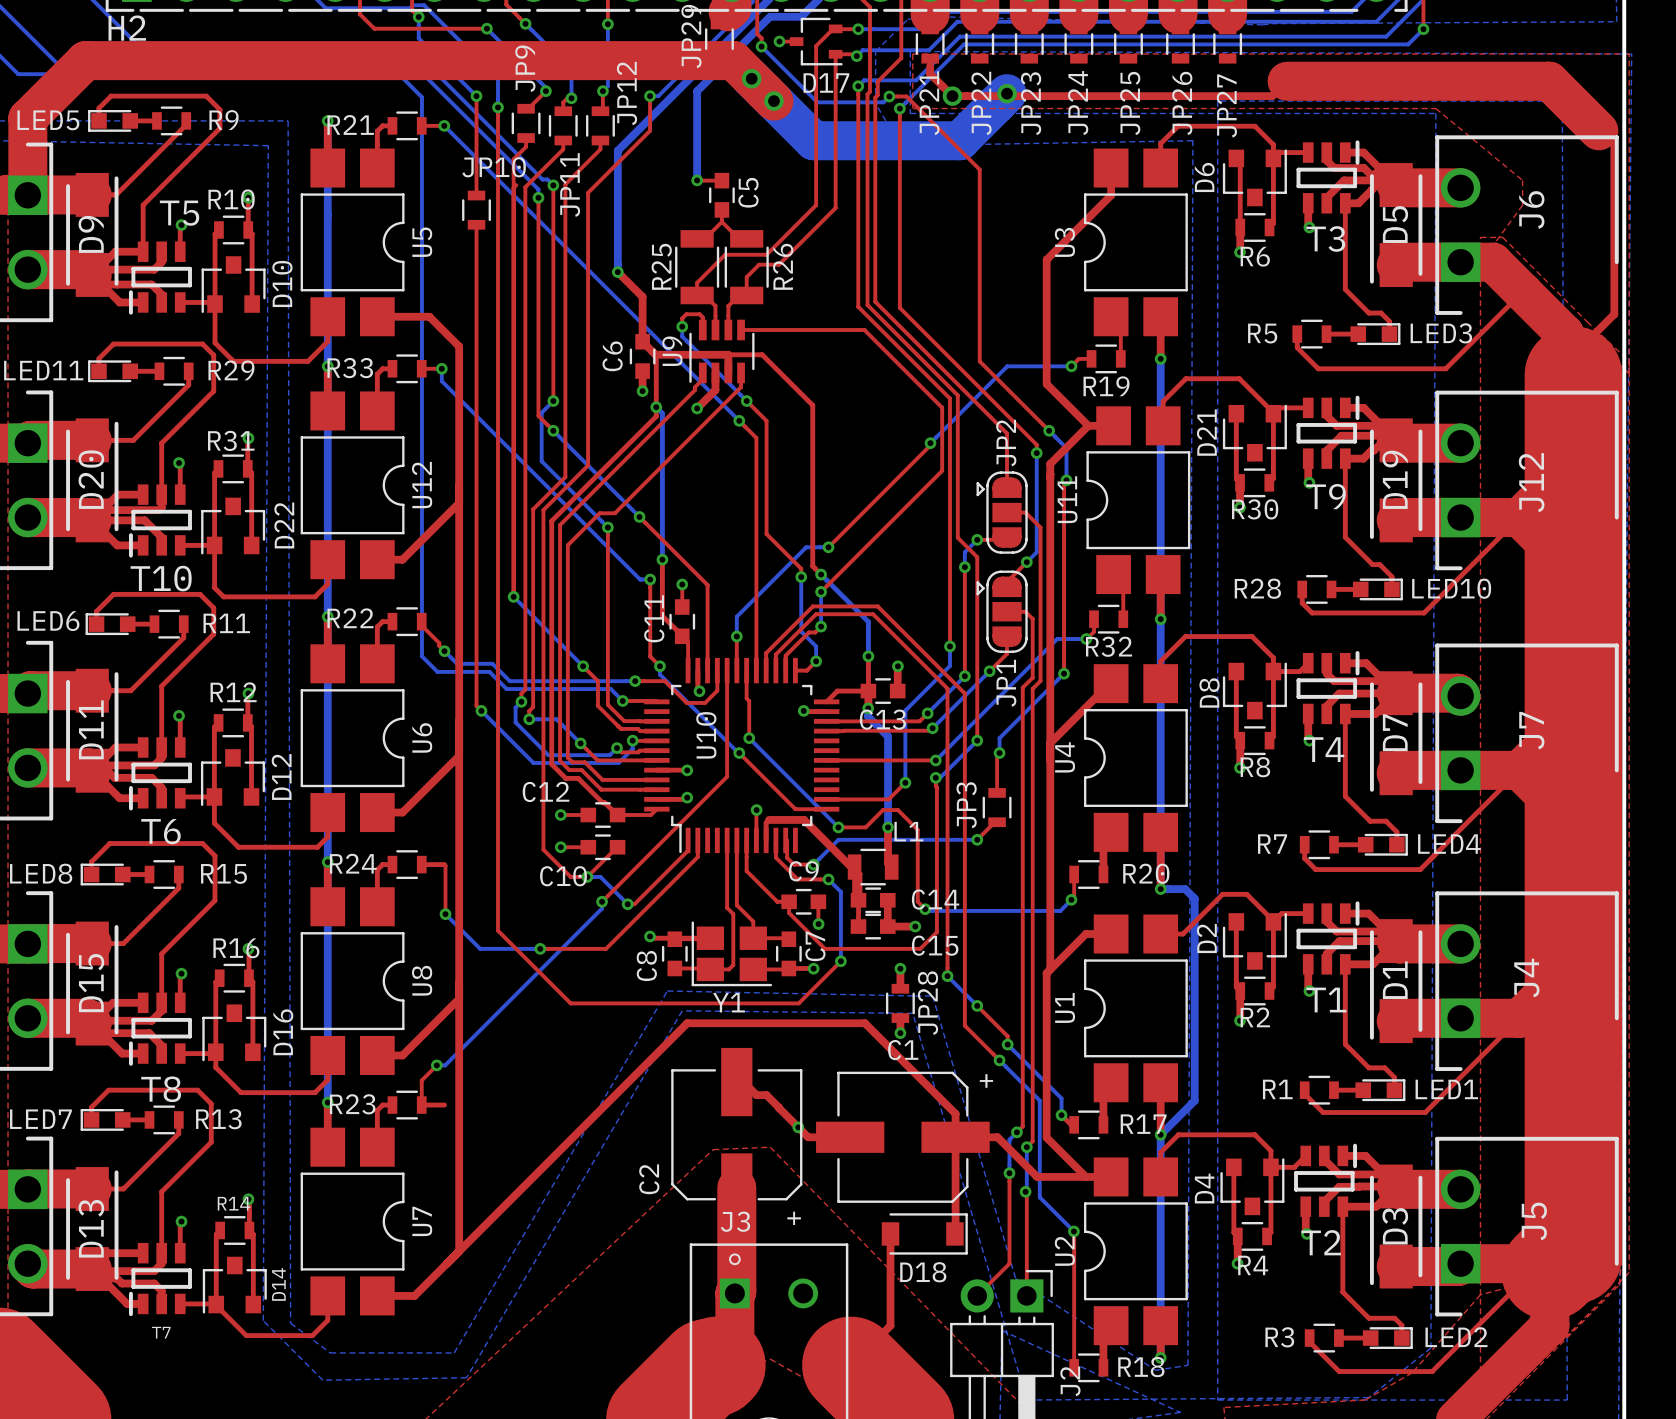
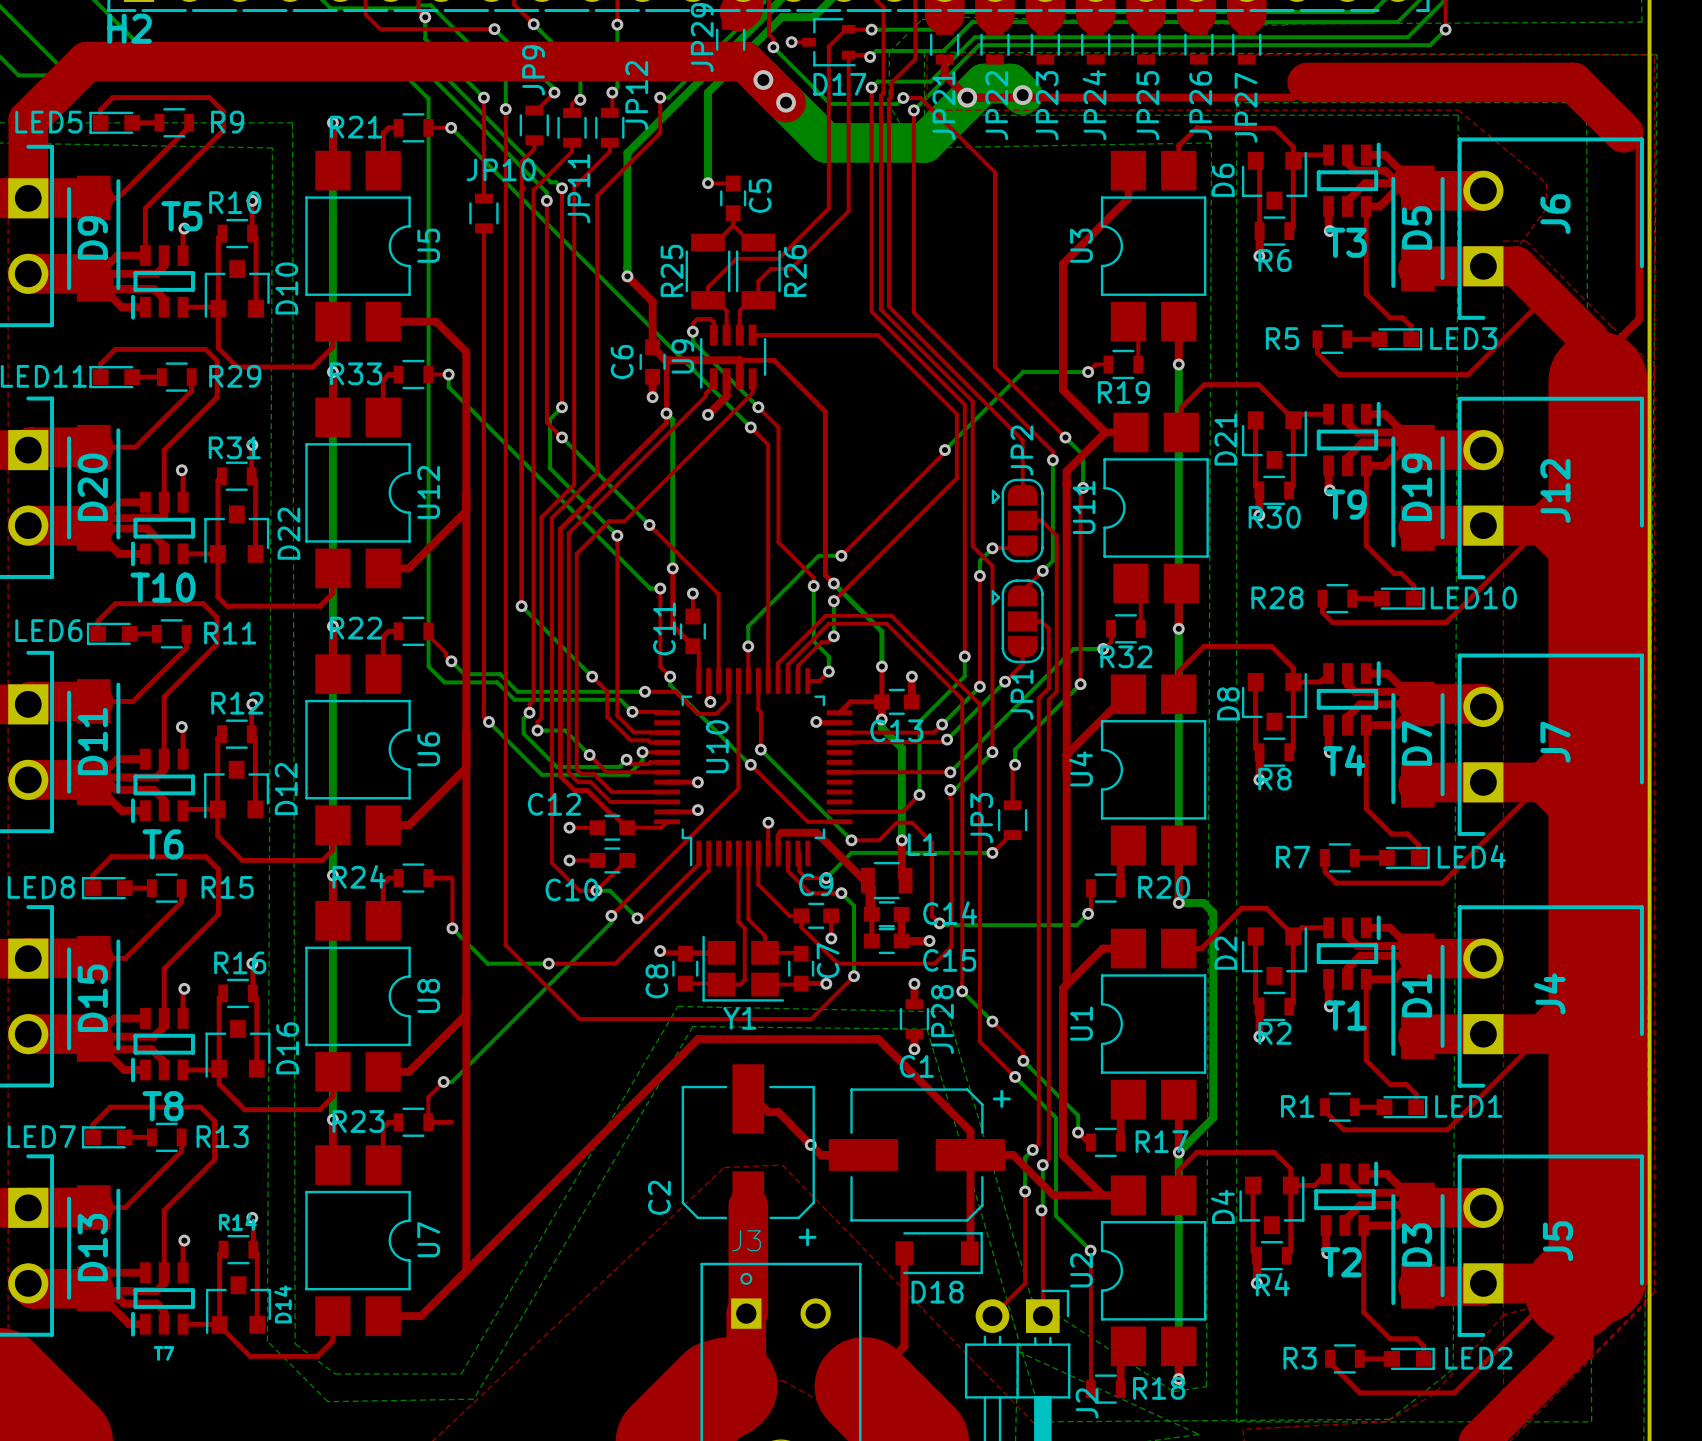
bottom track: (1007, 93) (959, 140) (910, 140) -> (1022, 95) (1011, 83) (983, 83) (924, 142)

